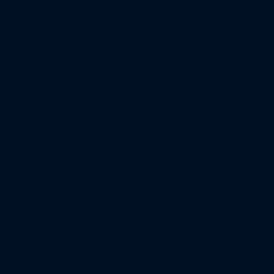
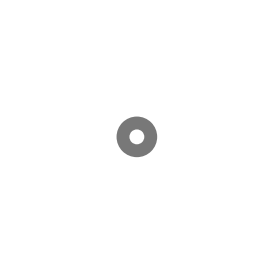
via: none -> (136, 136)

